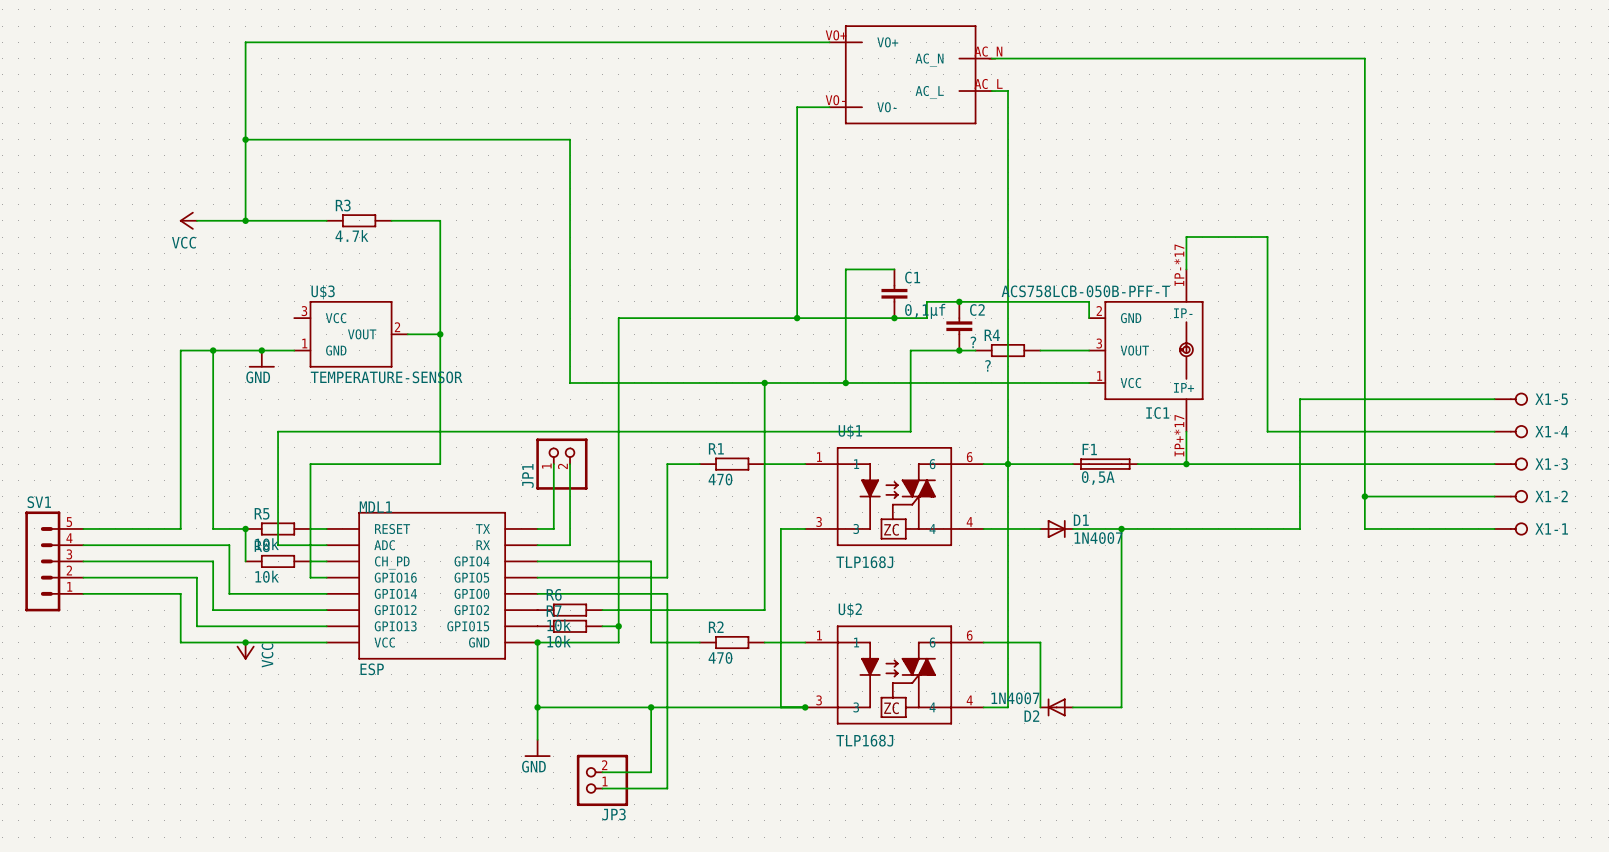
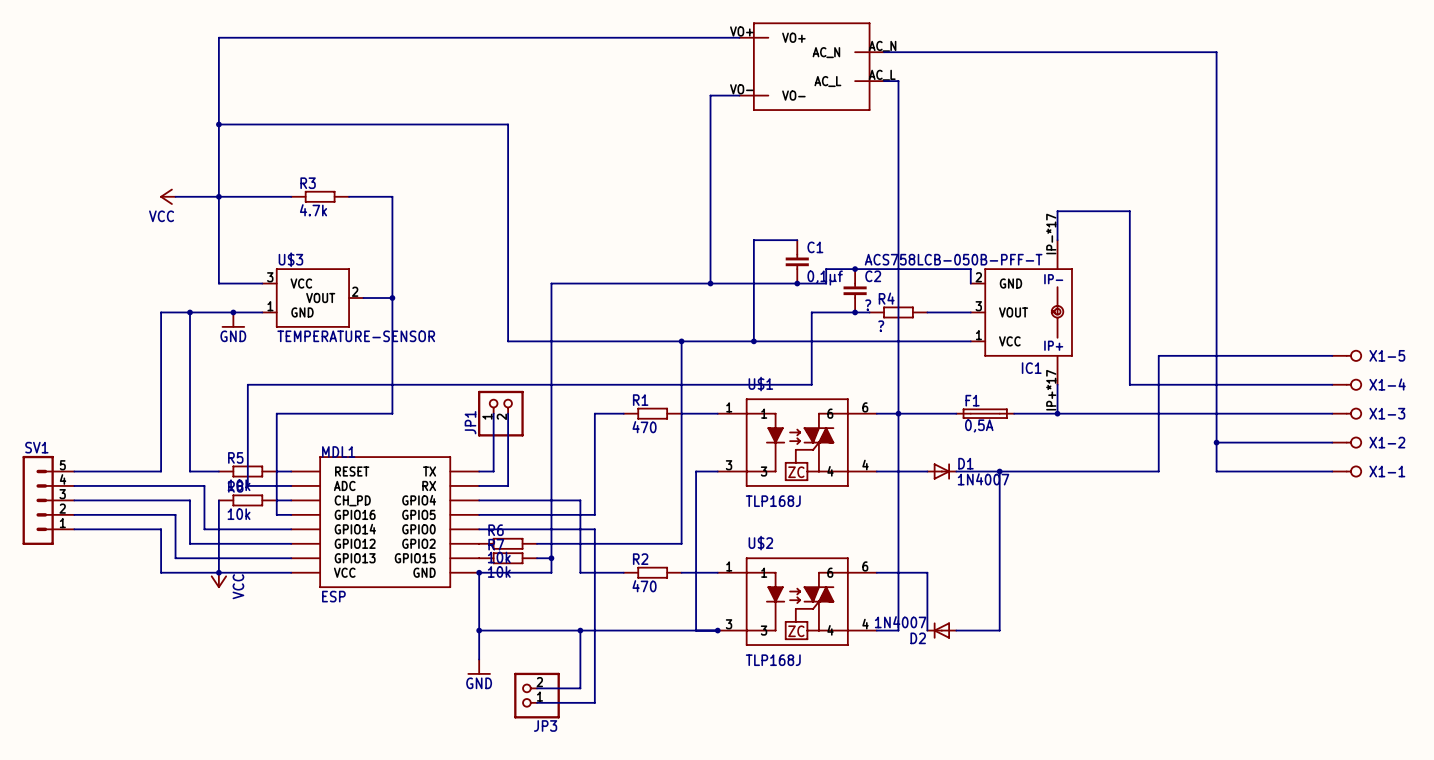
wire: none -> (218, 196) (218, 283) (262, 283)
wire: (245, 528) (245, 561) -> (218, 572) (218, 500)
junction: (245, 528) -> none

